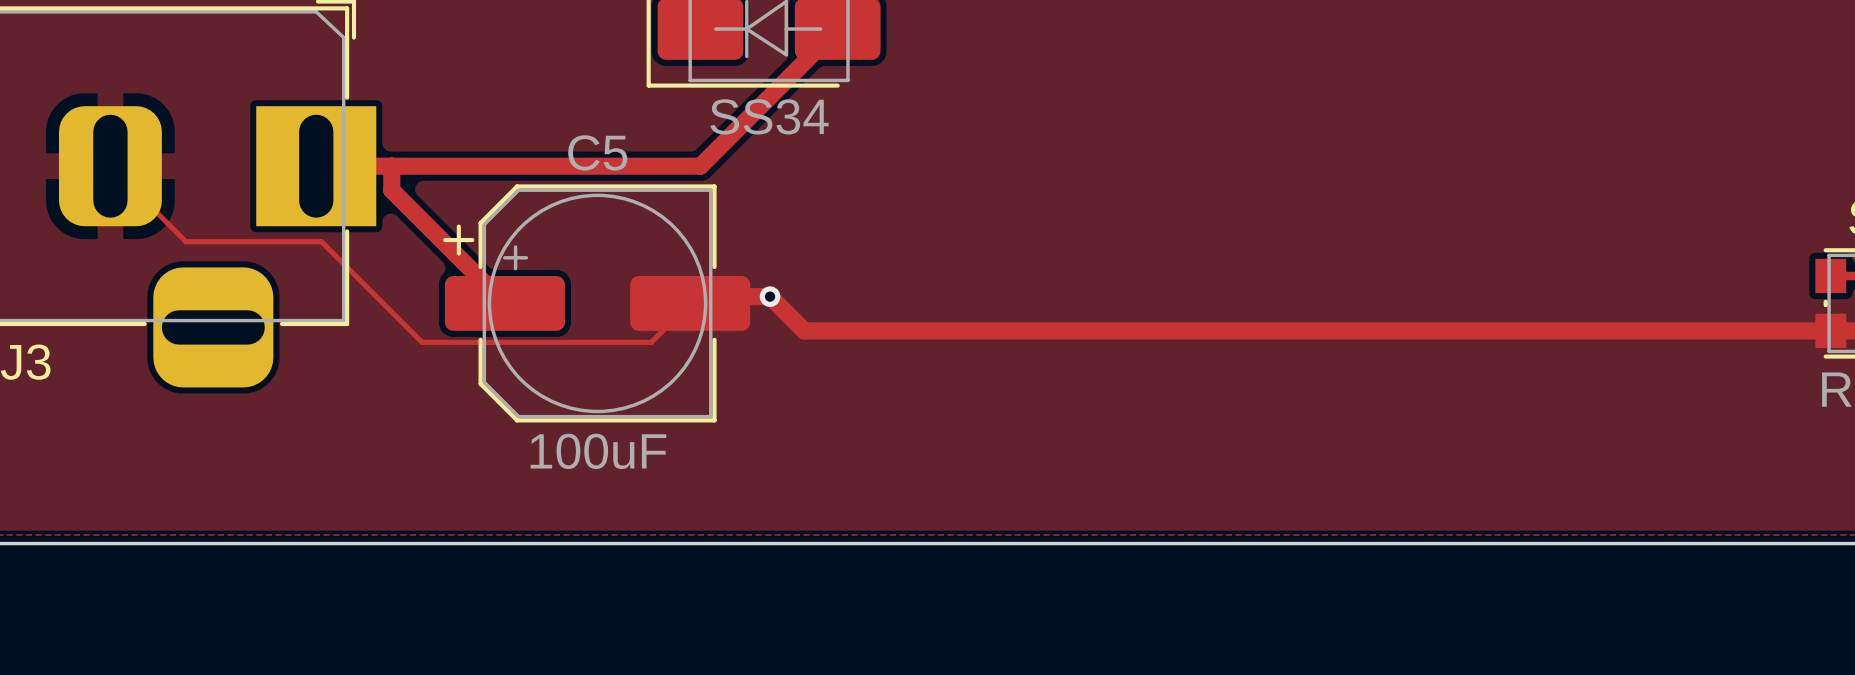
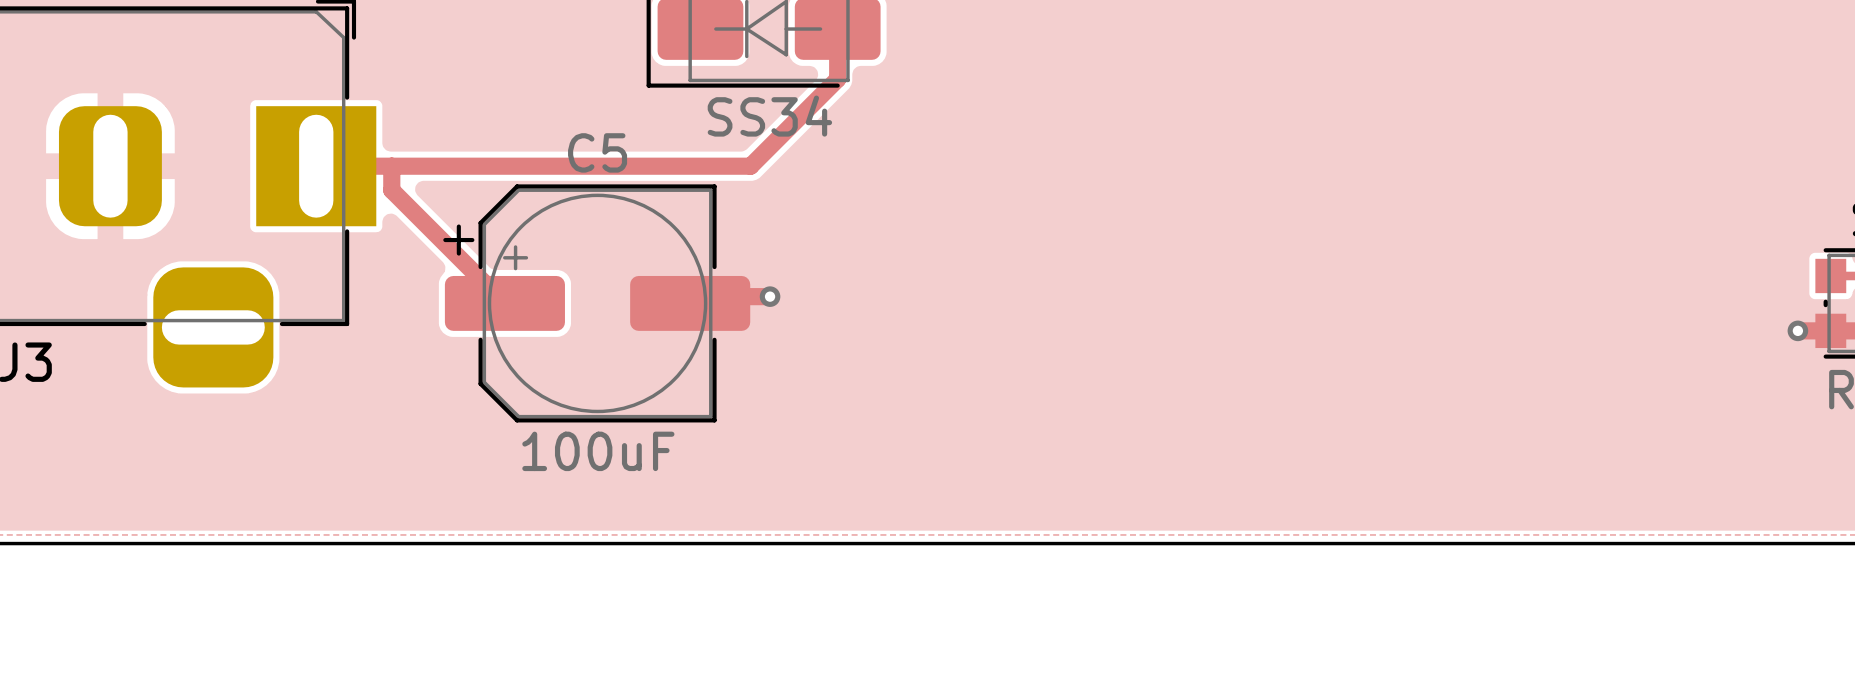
track: (837, 28) (700, 166) -> (837, 28) (837, 79) (750, 166) (700, 166)
track: (110, 166) (185, 241) (321, 241) (422, 342) (651, 342) (690, 303) -> none
track: (770, 296) (804, 330) (1797, 330) -> none
via: none -> (1797, 330)

